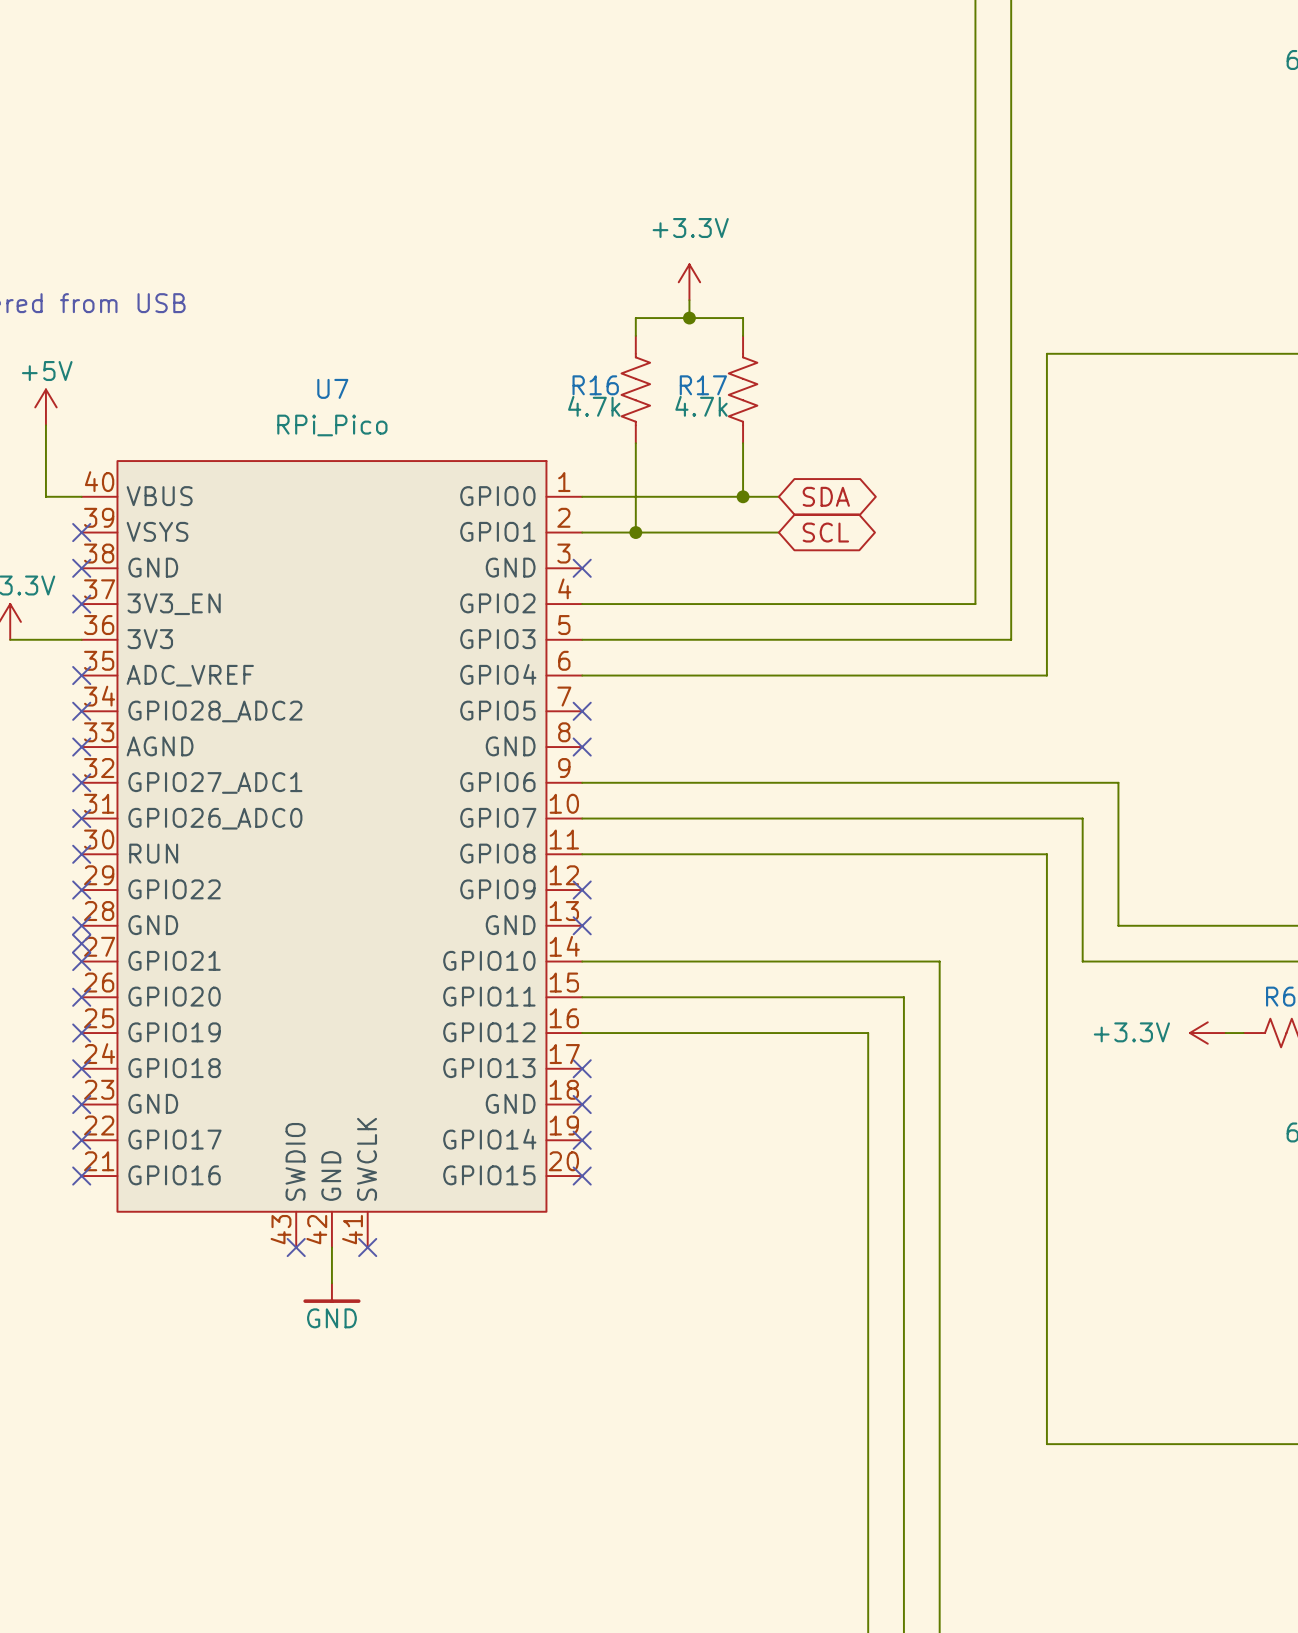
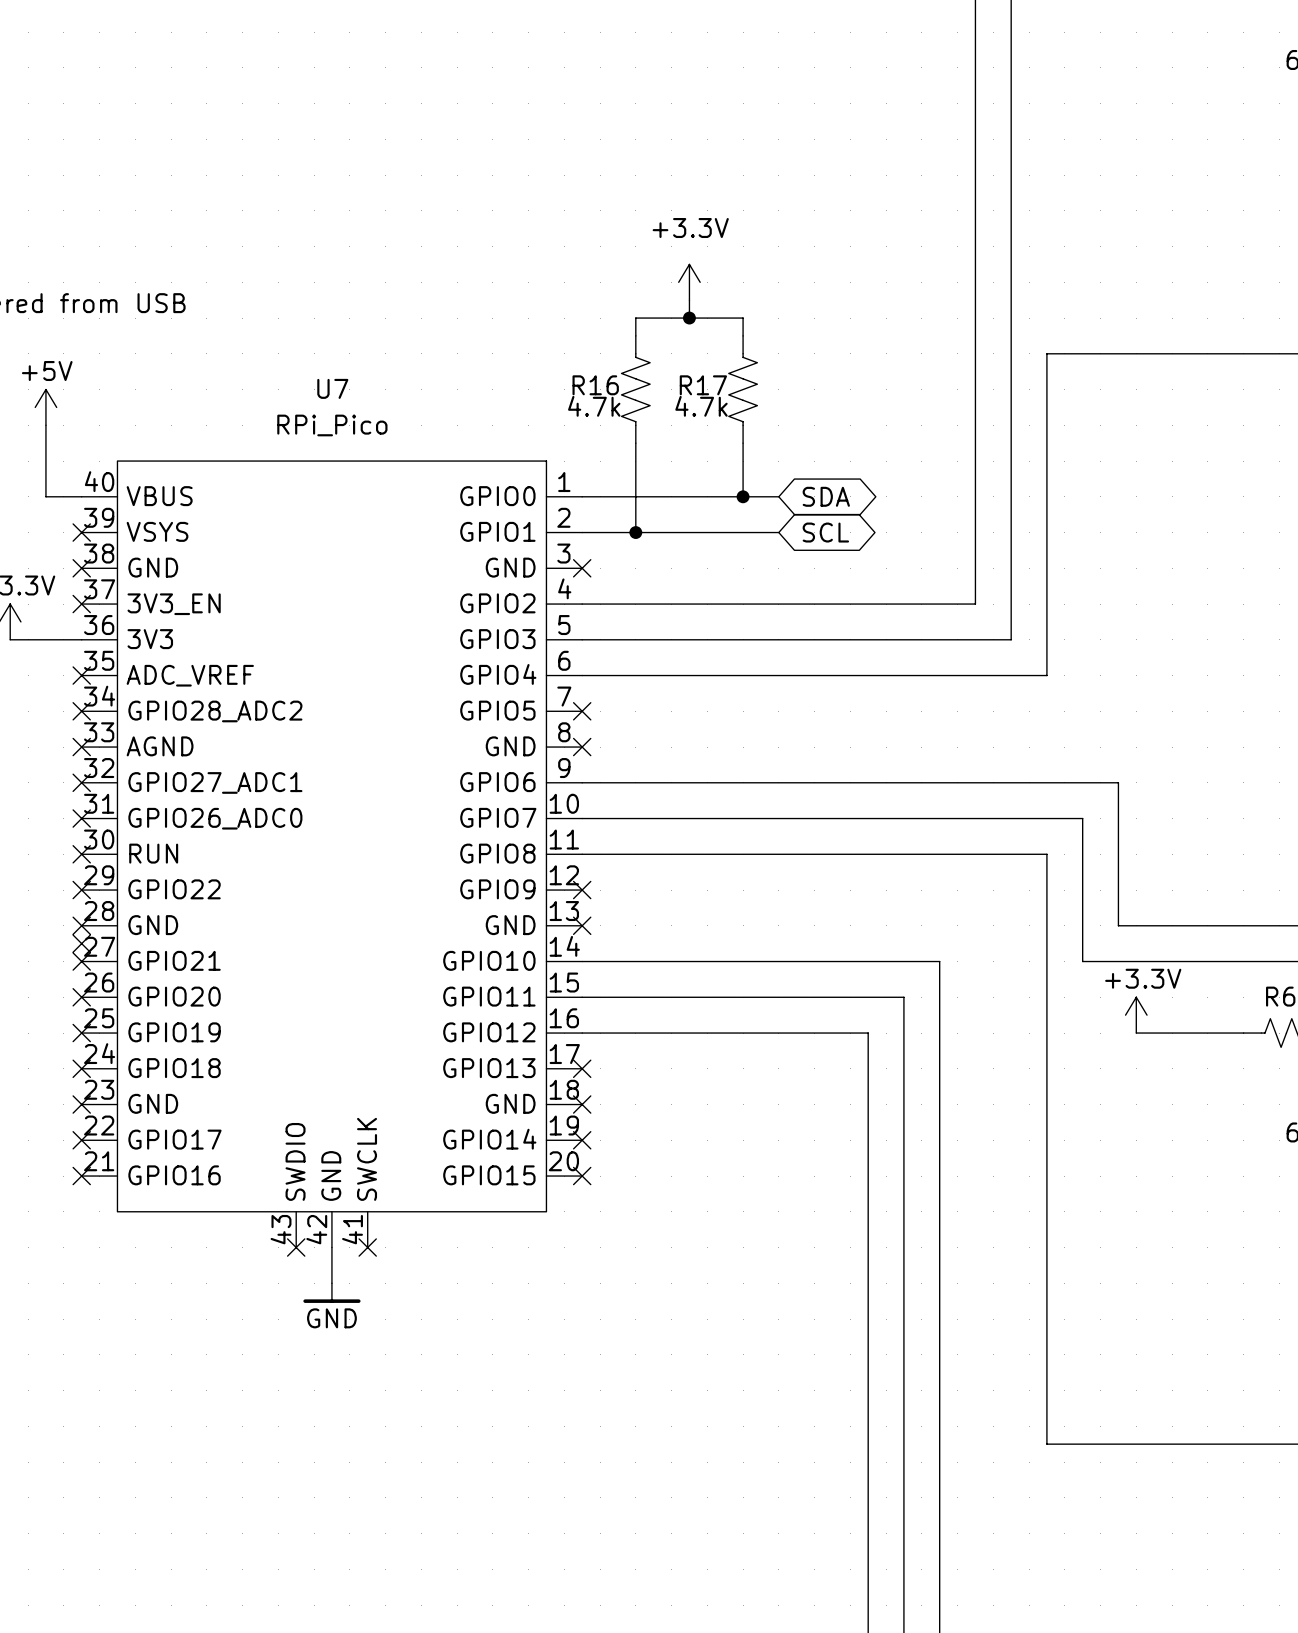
power symbol text position: +3.3V (1131, 1032) -> +3.3V (1143, 978)
wire: none -> (1136, 1033) (1225, 1033)
power symbol rotation: 0° (1207, 1033) -> 90° clockwise (1136, 1015)
power symbol position: +3.3V (1207, 1033) -> +3.3V (1136, 1015)

